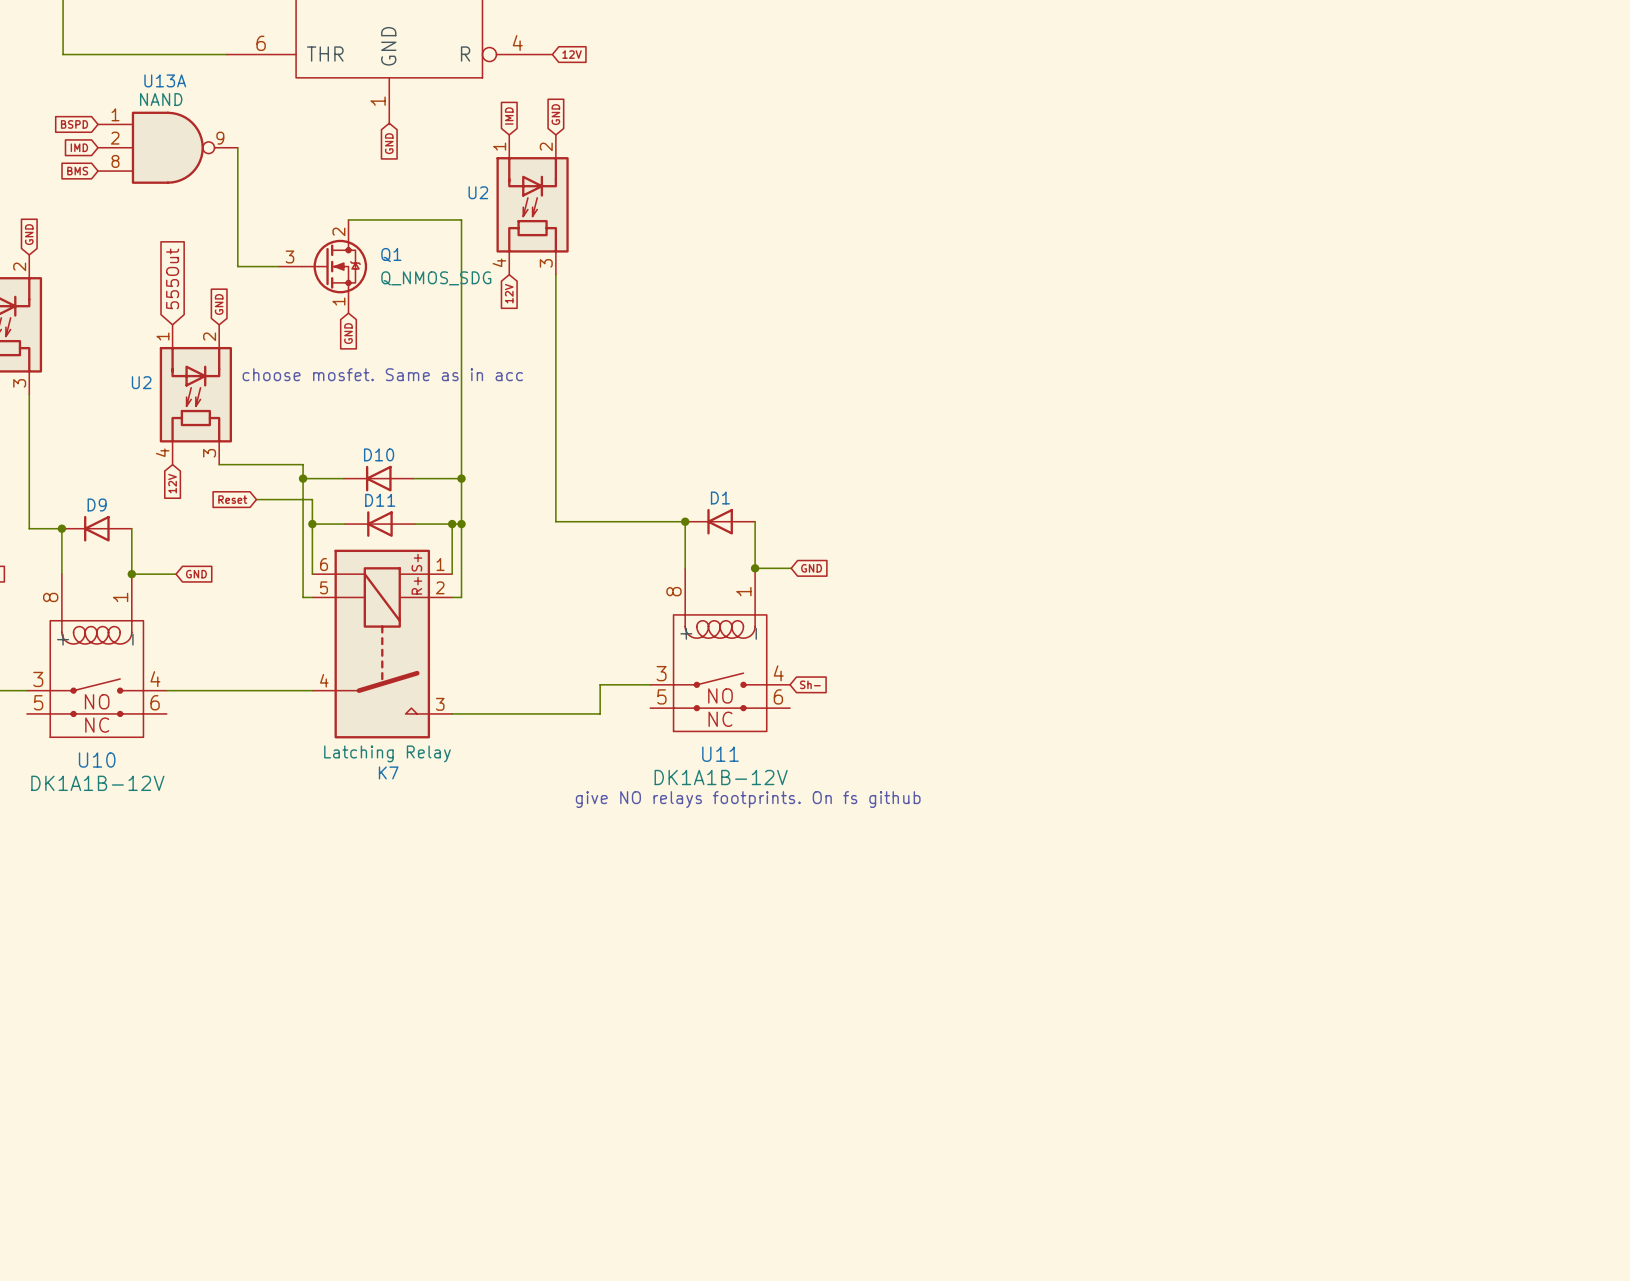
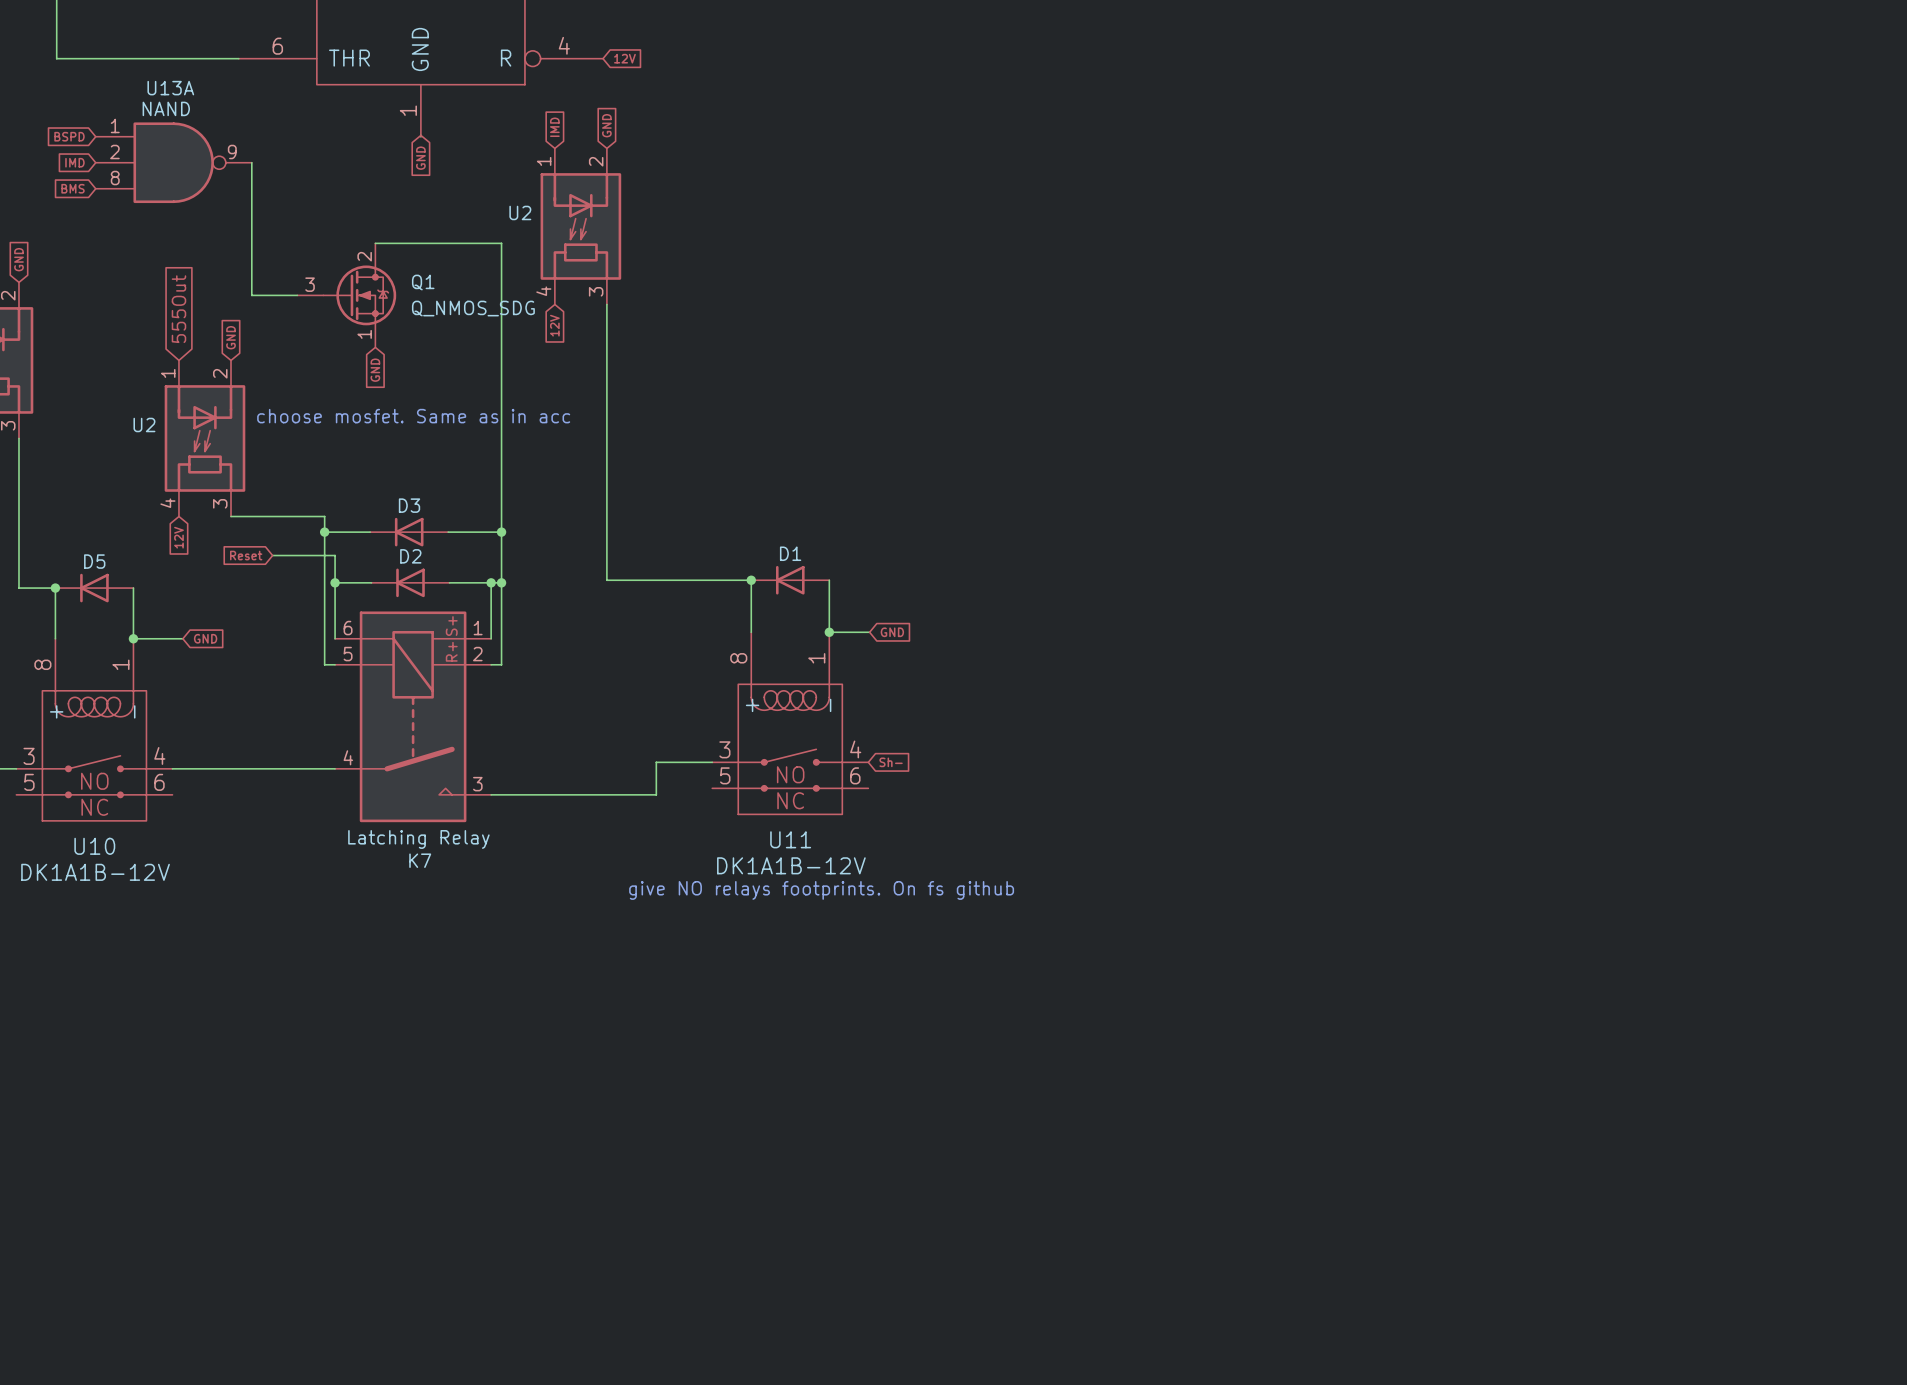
D10 name: D10 (379, 454) -> D3 (409, 505)
D11 name: D11 (380, 500) -> D2 (410, 556)
D9 name: D9 (97, 504) -> D5 (94, 561)

